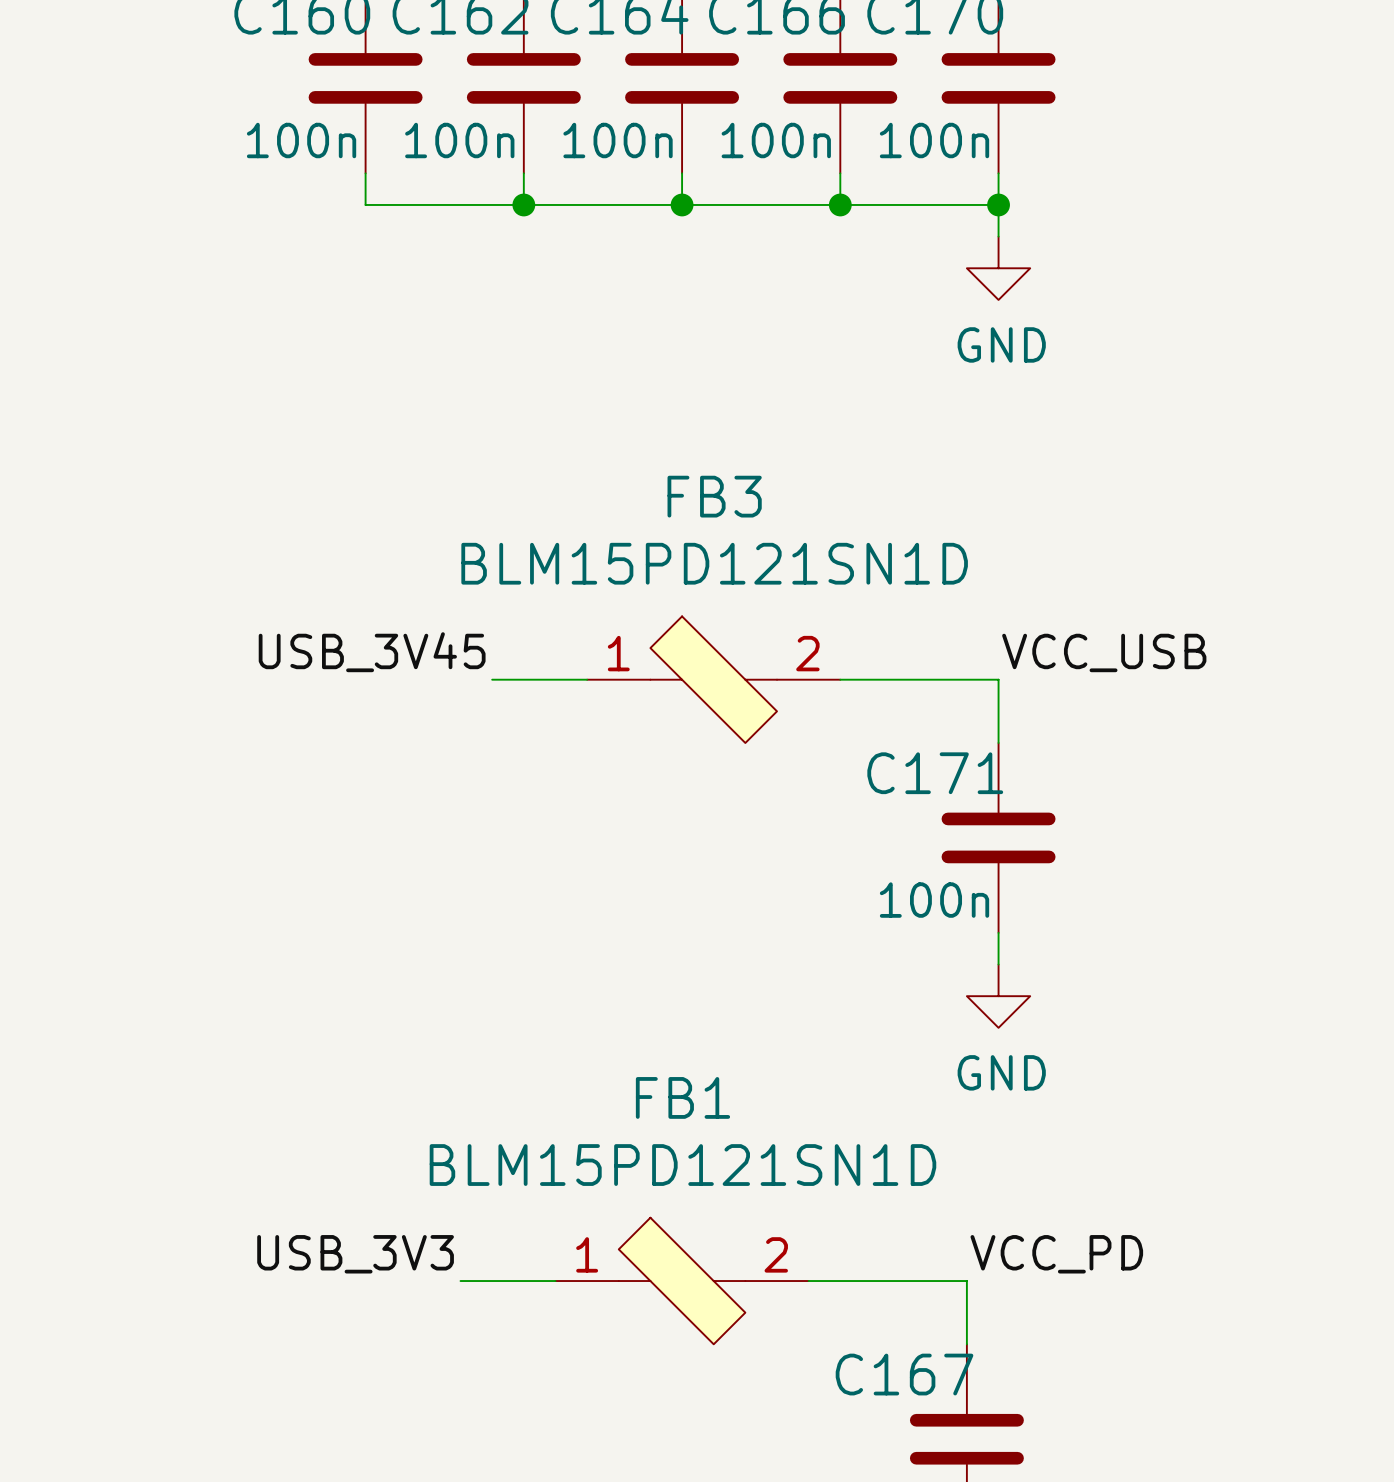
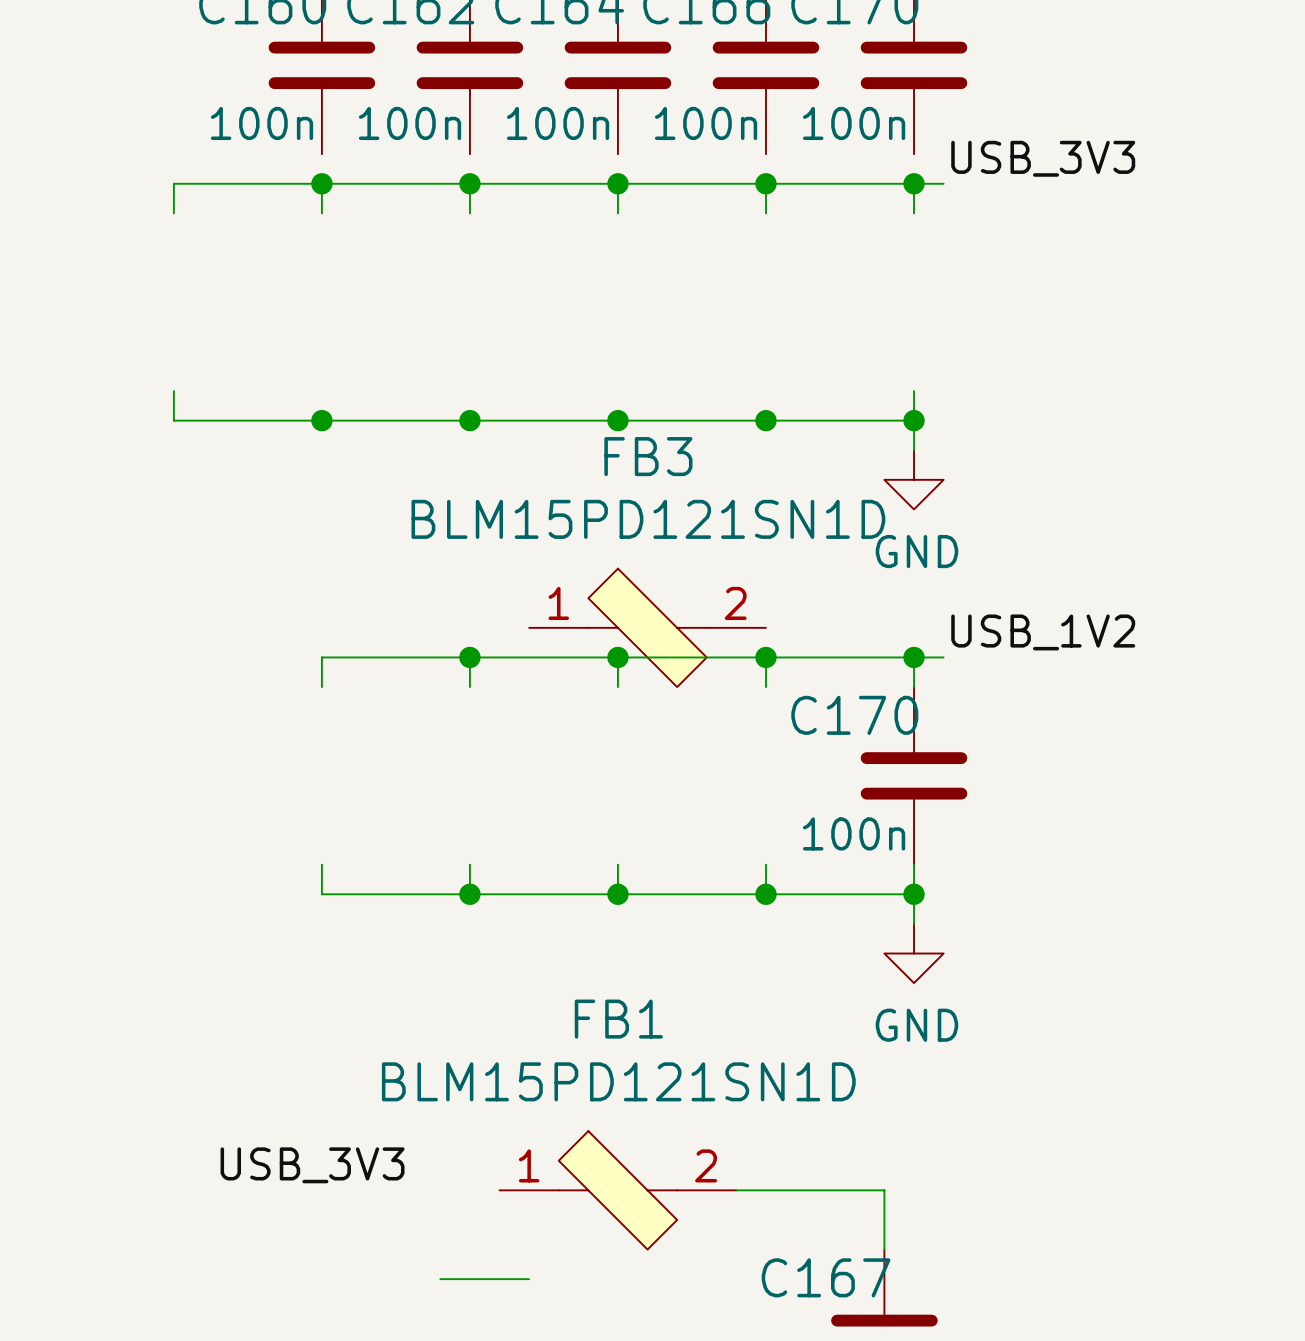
wire: (365, 173) (365, 204) -> (469, 657) (469, 687)
wire: (523, 173) (523, 204) -> (469, 213) (469, 183)
wire: (682, 173) (682, 204) -> (617, 213) (617, 183)
wire: (840, 173) (840, 204) -> (765, 213) (765, 183)
wire: (998, 173) (998, 204) -> (943, 183) (914, 183)
label: none -> USB_3V3 (1043, 158)
junction: none -> (321, 183)
wire: none -> (173, 213) (173, 183) (321, 183) (321, 213)
power symbol: GND (998, 268) -> none
wire: none -> (173, 391) (173, 420) (914, 420)
wire: none -> (914, 391) (914, 450)
junction: none -> (321, 420)
junction: none -> (469, 420)
junction: none -> (617, 420)
junction: none -> (765, 420)
junction: none -> (914, 420)
power symbol: none -> GND (914, 479)
label: USB_3V45 (372, 652) -> none
label: VCC_USB (1104, 652) -> none
wire: (492, 679) (587, 679) -> none
wire: (840, 679) (998, 679) (998, 711) -> none
label: none -> USB_1V2 (1043, 632)
junction: none -> (469, 657)
wire: none -> (617, 657) (617, 687)
junction: none -> (617, 657)
wire: none -> (765, 657) (765, 687)
junction: none -> (765, 657)
junction: none -> (914, 657)
wire: none -> (943, 657) (321, 657) (321, 687)
C171 name: C171 (935, 773) -> C170 (854, 715)
wire: none -> (321, 864) (321, 894) (914, 894) (914, 923)
wire: none -> (469, 864) (469, 894)
wire: none -> (617, 864) (617, 894)
wire: none -> (765, 864) (765, 894)
junction: none -> (469, 894)
junction: none -> (617, 894)
junction: none -> (765, 894)
junction: none -> (914, 894)
power symbol position: GND (998, 996) -> GND (914, 953)
label: VCC_PD (1056, 1254) -> none
wire: (460, 1281) (555, 1281) -> (440, 1279) (529, 1279)

